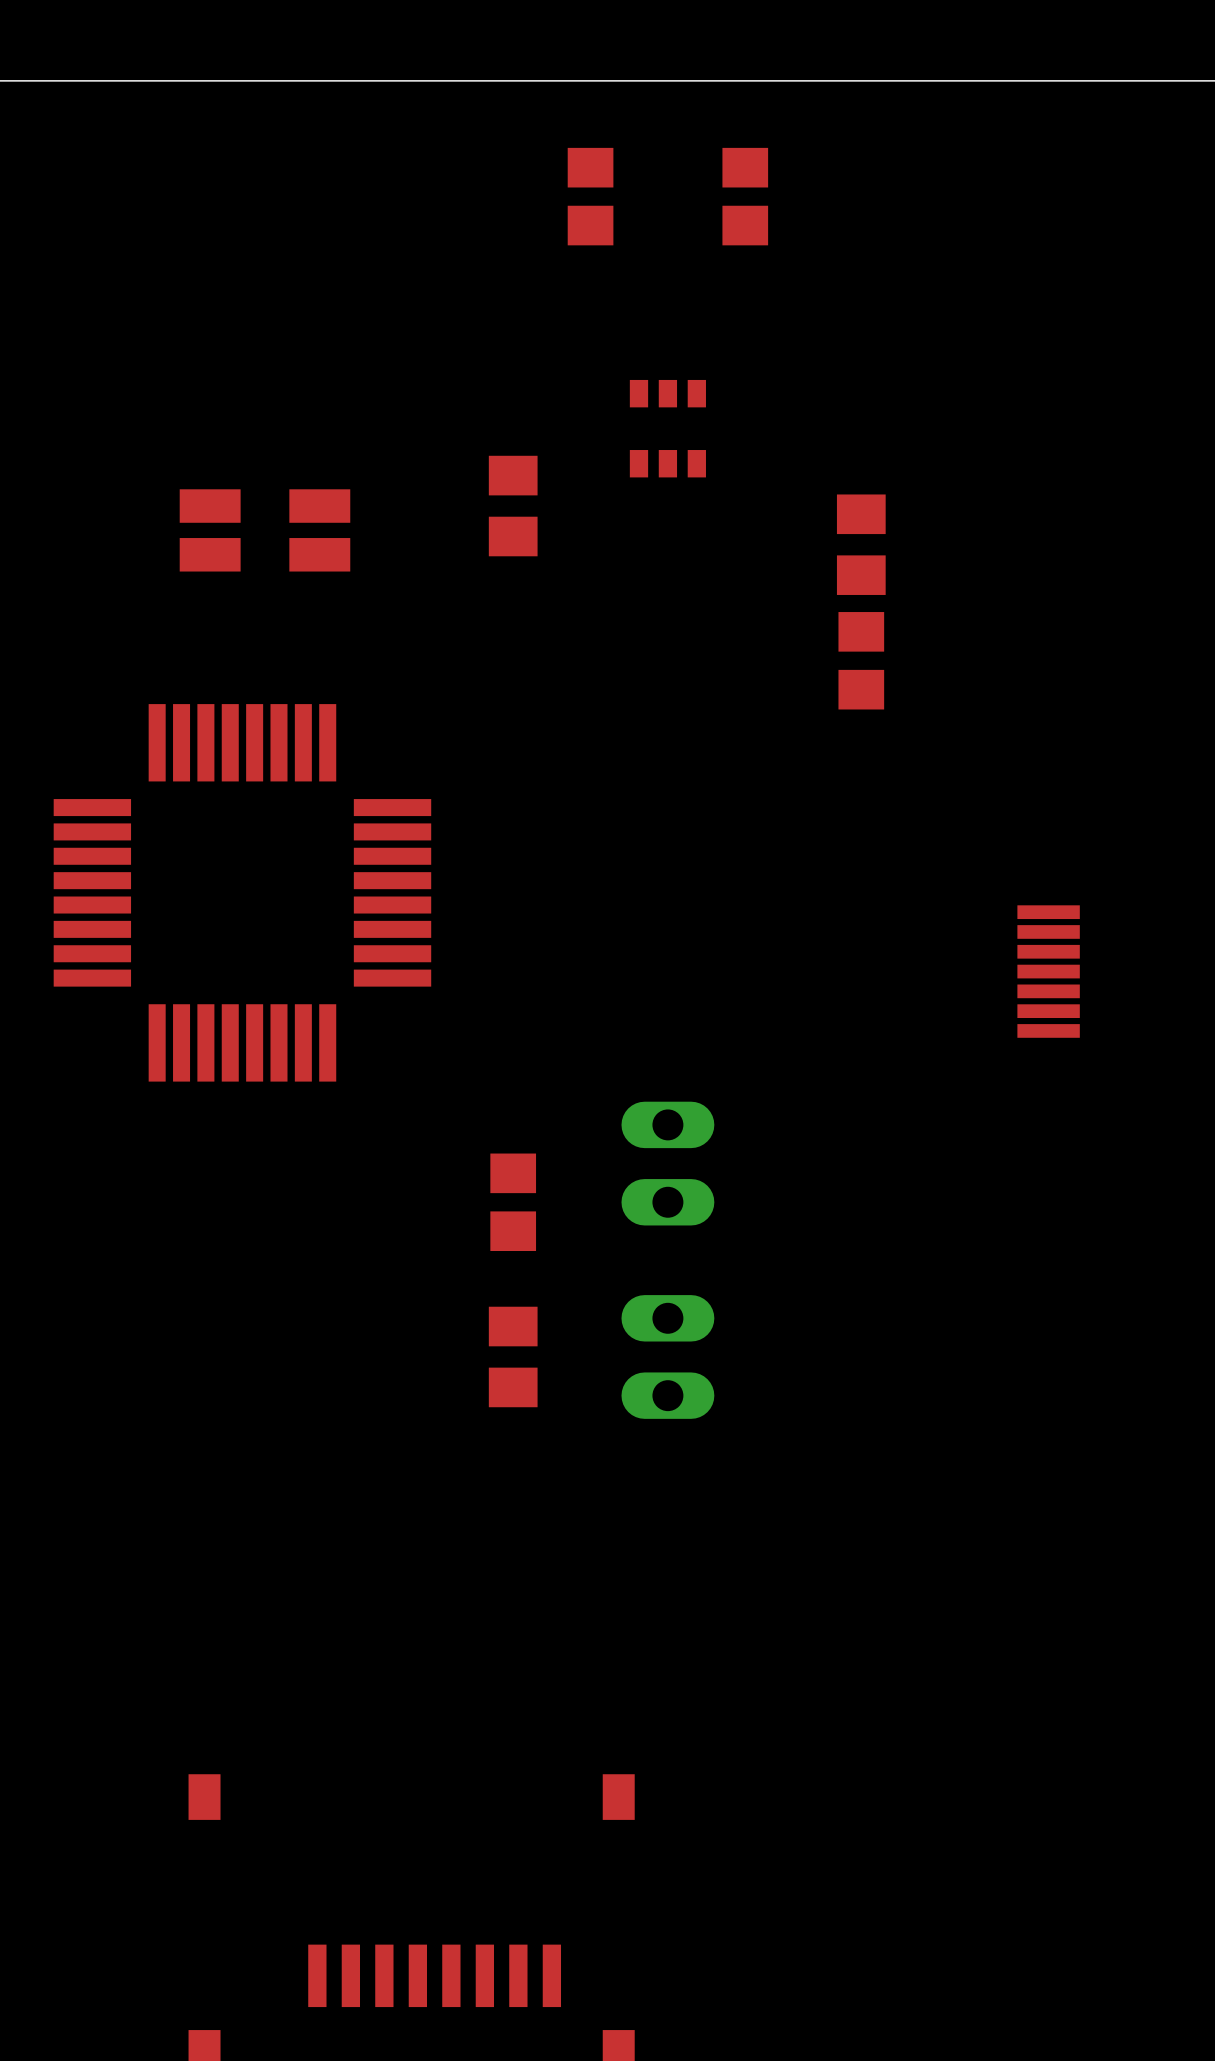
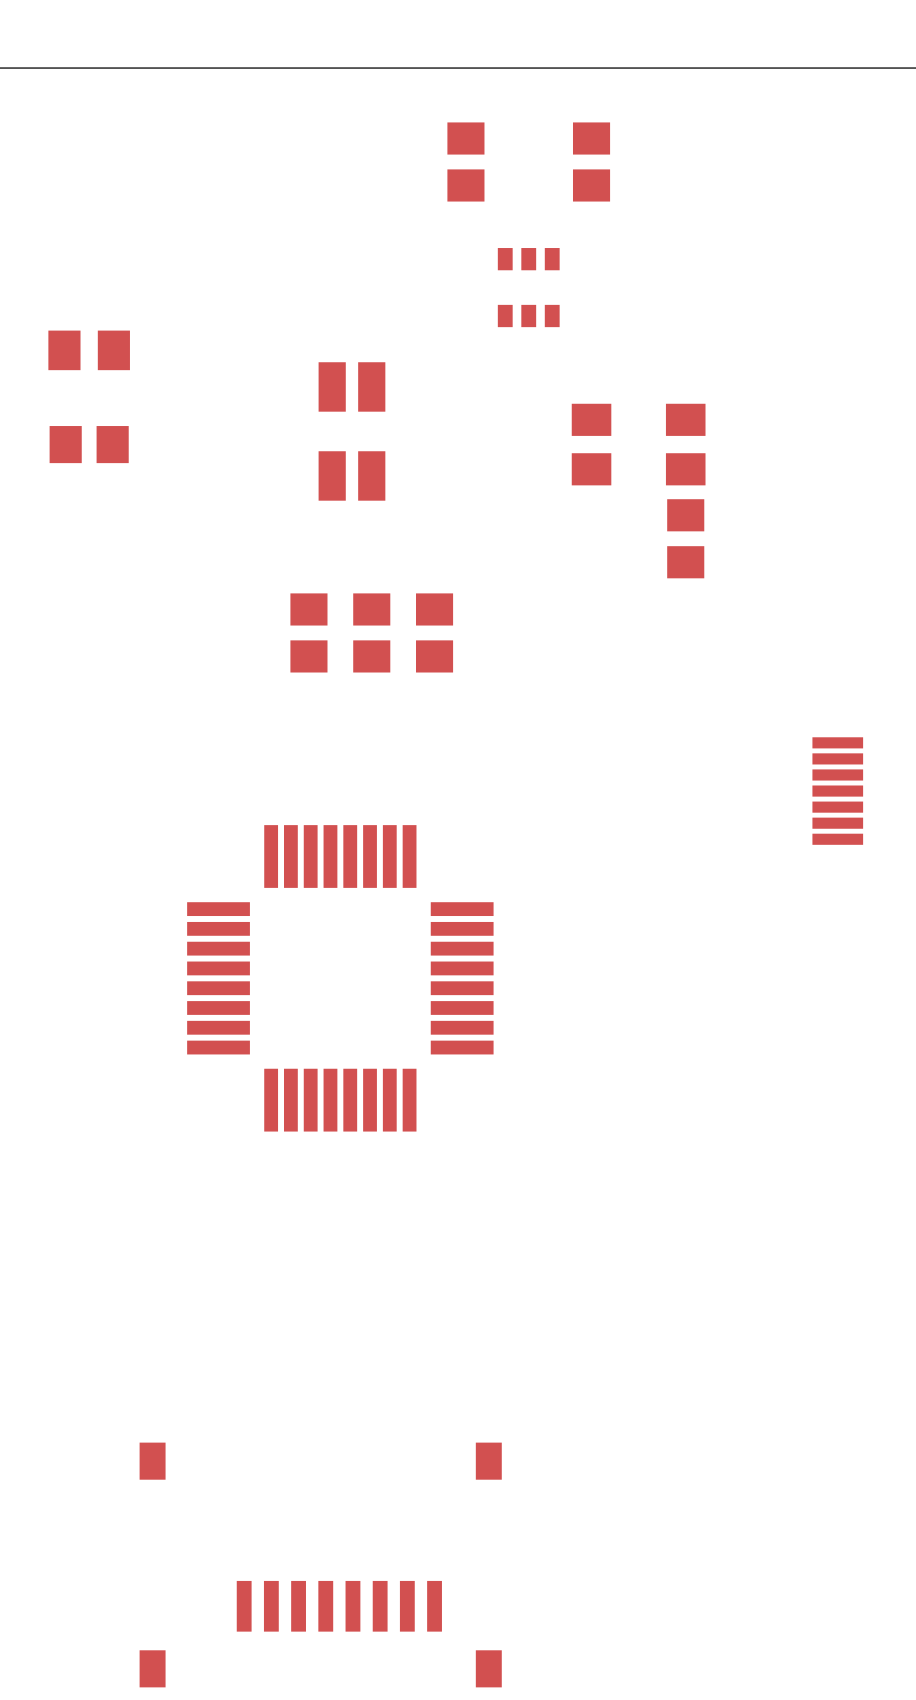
part: none -> (89, 350)
part position: (667, 428) -> (528, 287)
part: (513, 506) -> none
part rotation: 0° (264, 530) -> 90° clockwise (351, 431)
part position: (264, 530) -> (351, 431)
part: none -> (89, 444)
part: none -> (591, 444)
part: none -> (308, 632)
part: none -> (371, 632)
part: none -> (434, 632)
part position: (242, 892) -> (340, 978)
part: (667, 1163) -> none
part: (513, 1202) -> none
part: (513, 1356) -> none
part: (667, 1356) -> none

